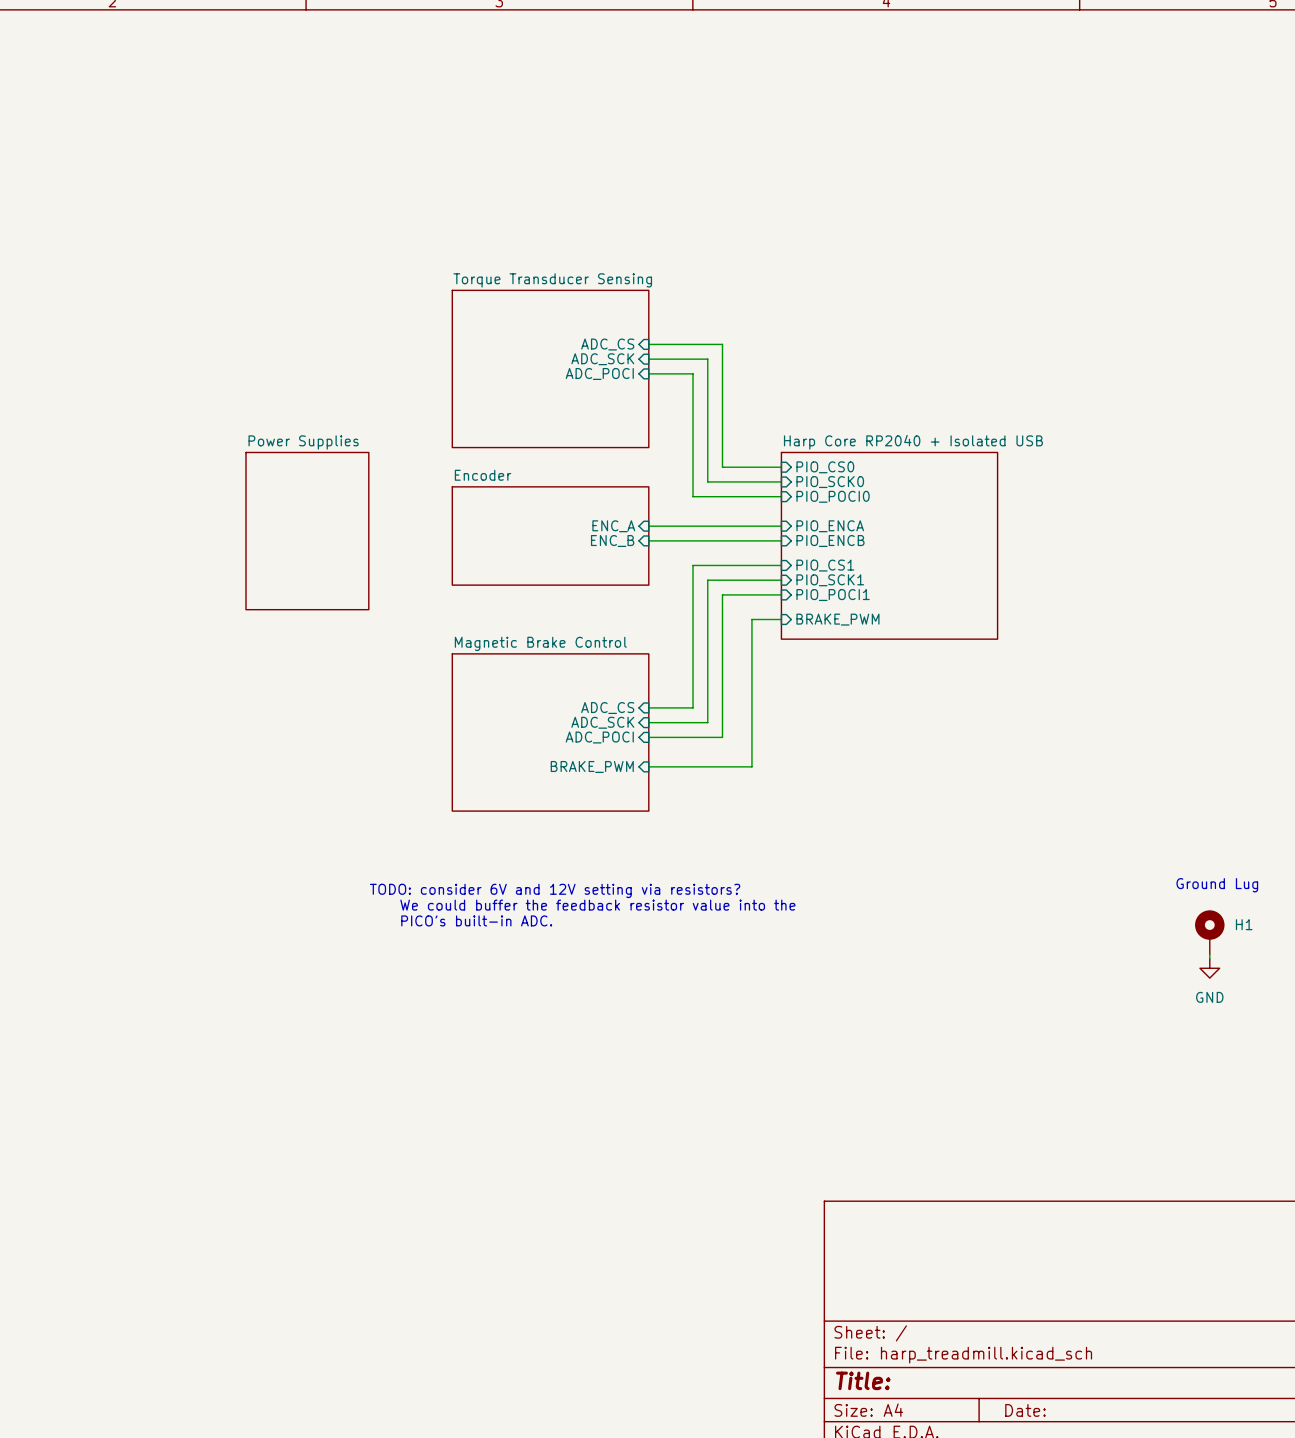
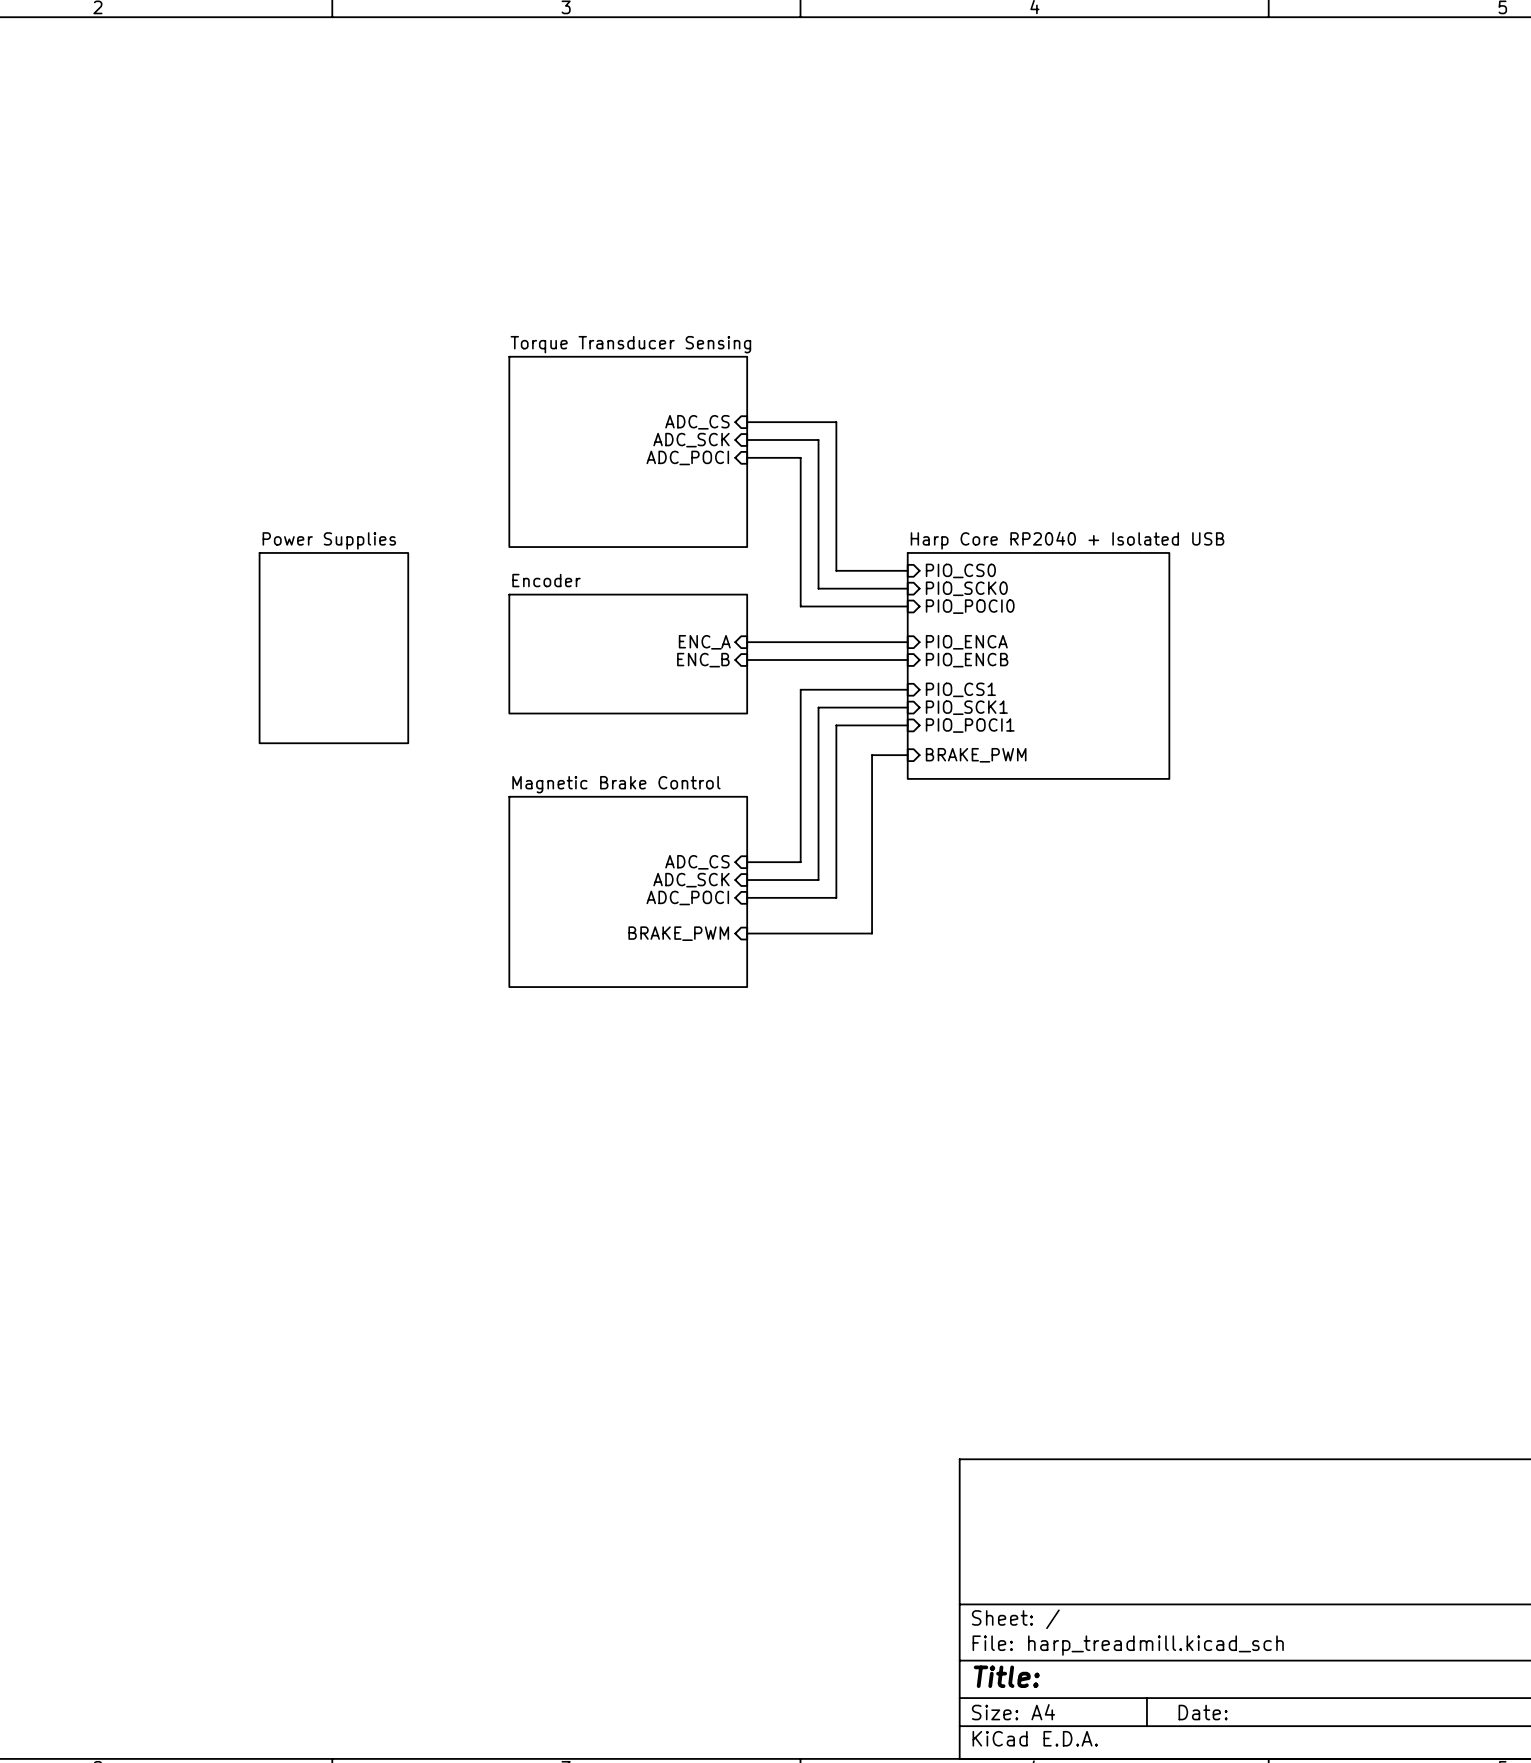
text: Ground Lug (1217, 885) -> none
text: TODO: consider 6V and 12V setting via resistors? (555, 890) -> none
text: We could buffer the feedback resistor value into the (597, 905) -> none
text: PICO's built-in ADC. (476, 920) -> none
H1: (1209, 932) -> none
wire: (1209, 954) (1209, 958) -> none
power symbol: GND (1209, 968) -> none

